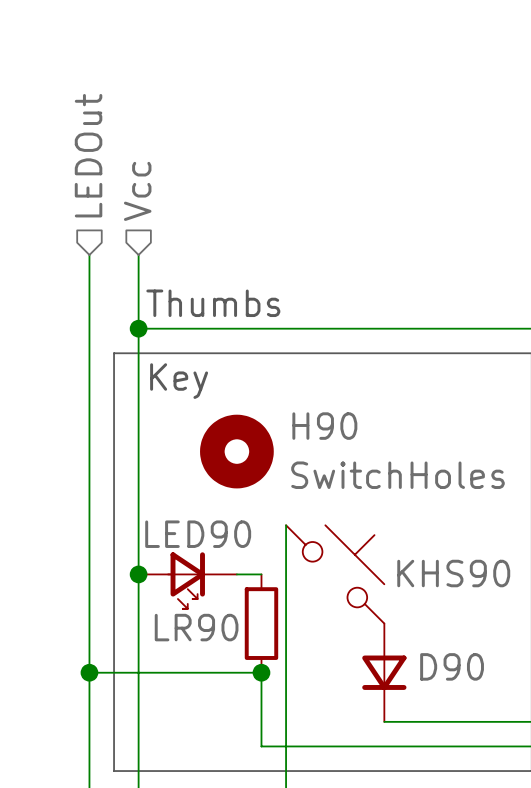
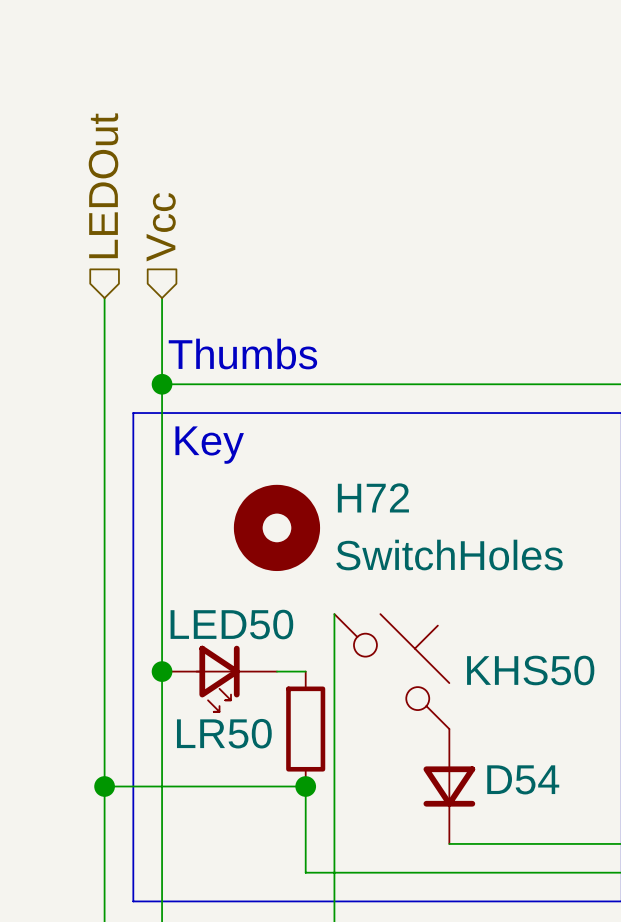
H90 name: H90 (324, 426) -> H72 (373, 497)
LED90 name: LED90 (198, 534) -> LED50 (231, 624)
KHS90 name: KHS90 (453, 573) -> KHS50 (530, 670)
LR90 name: LR90 (196, 627) -> LR50 (224, 733)
D90 name: D90 (452, 666) -> D54 (523, 779)

